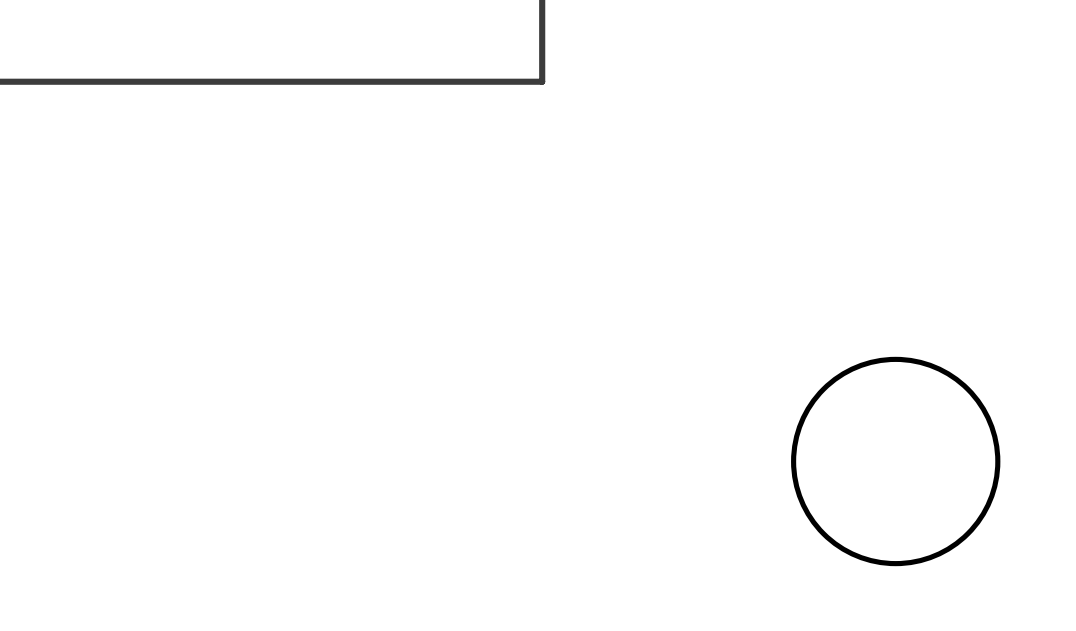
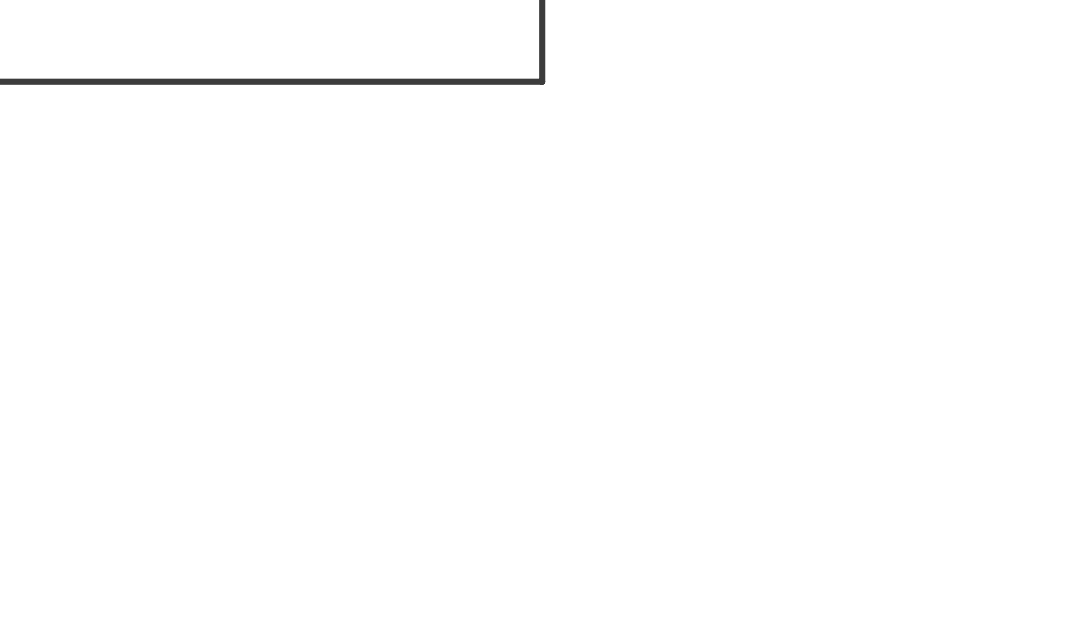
round board edge: [791, 356, 1001, 567] -> none

